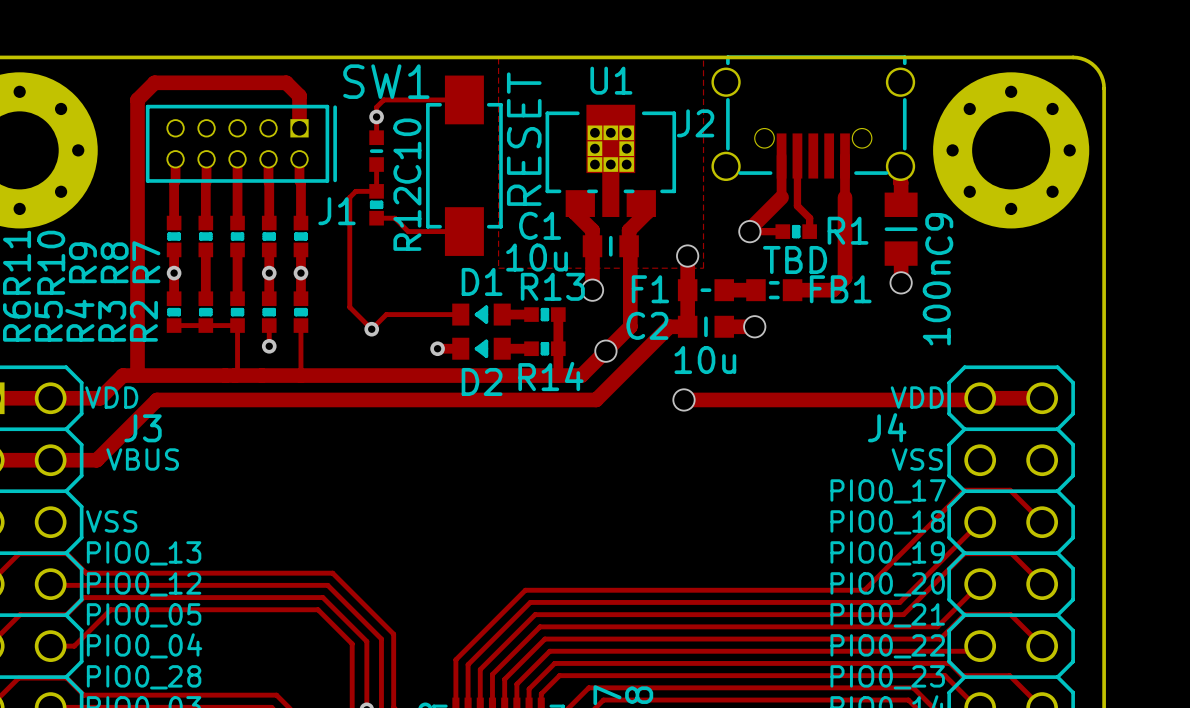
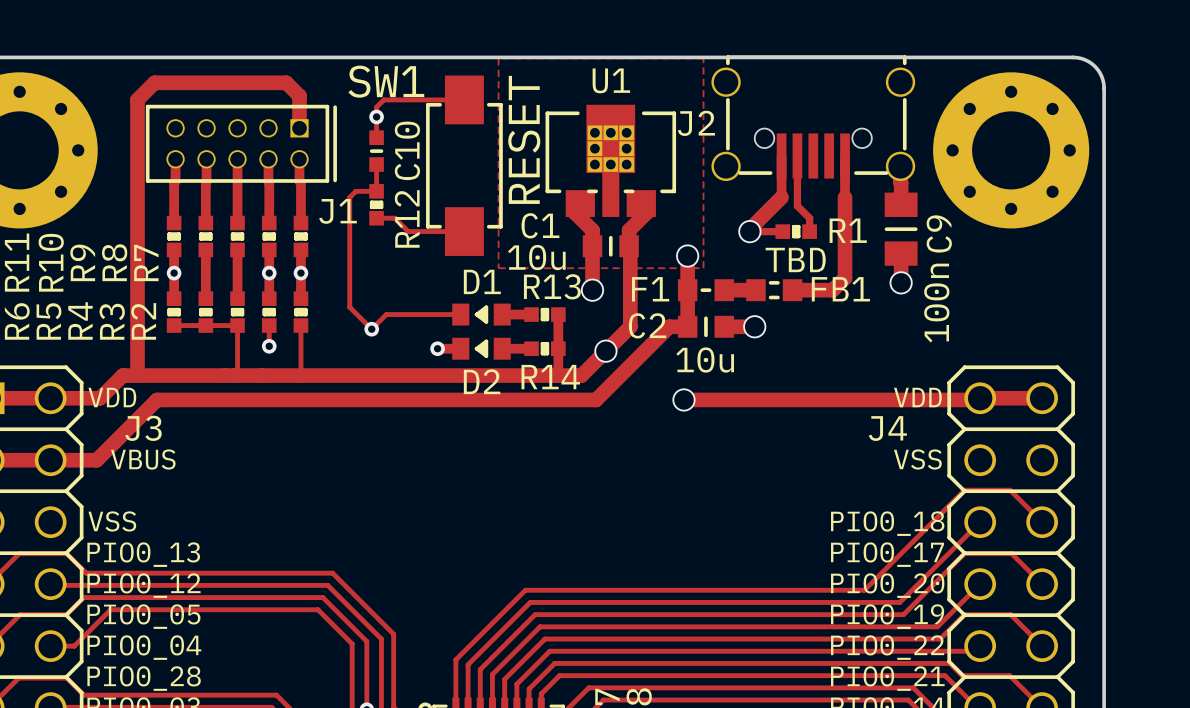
J4 text: PIO0_17 (888, 491) -> none
J4 text: PIO0_19 (887, 553) -> PIO0_17 (887, 554)
J4 text: PIO0_21 (887, 615) -> PIO0_19 (887, 616)
J4 text: PIO0_23 (887, 677) -> PIO0_21 (887, 678)

